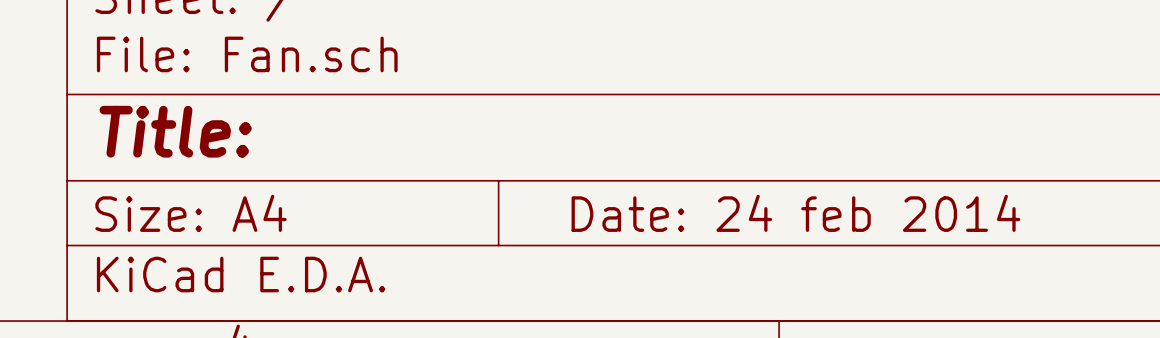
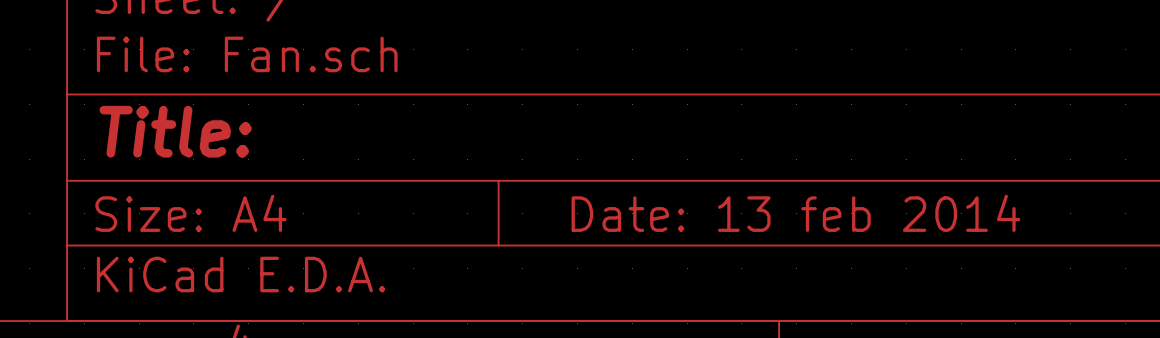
title block: Date: 24 feb 2014 (795, 213) -> Date: 13 feb 2014 (795, 213)

